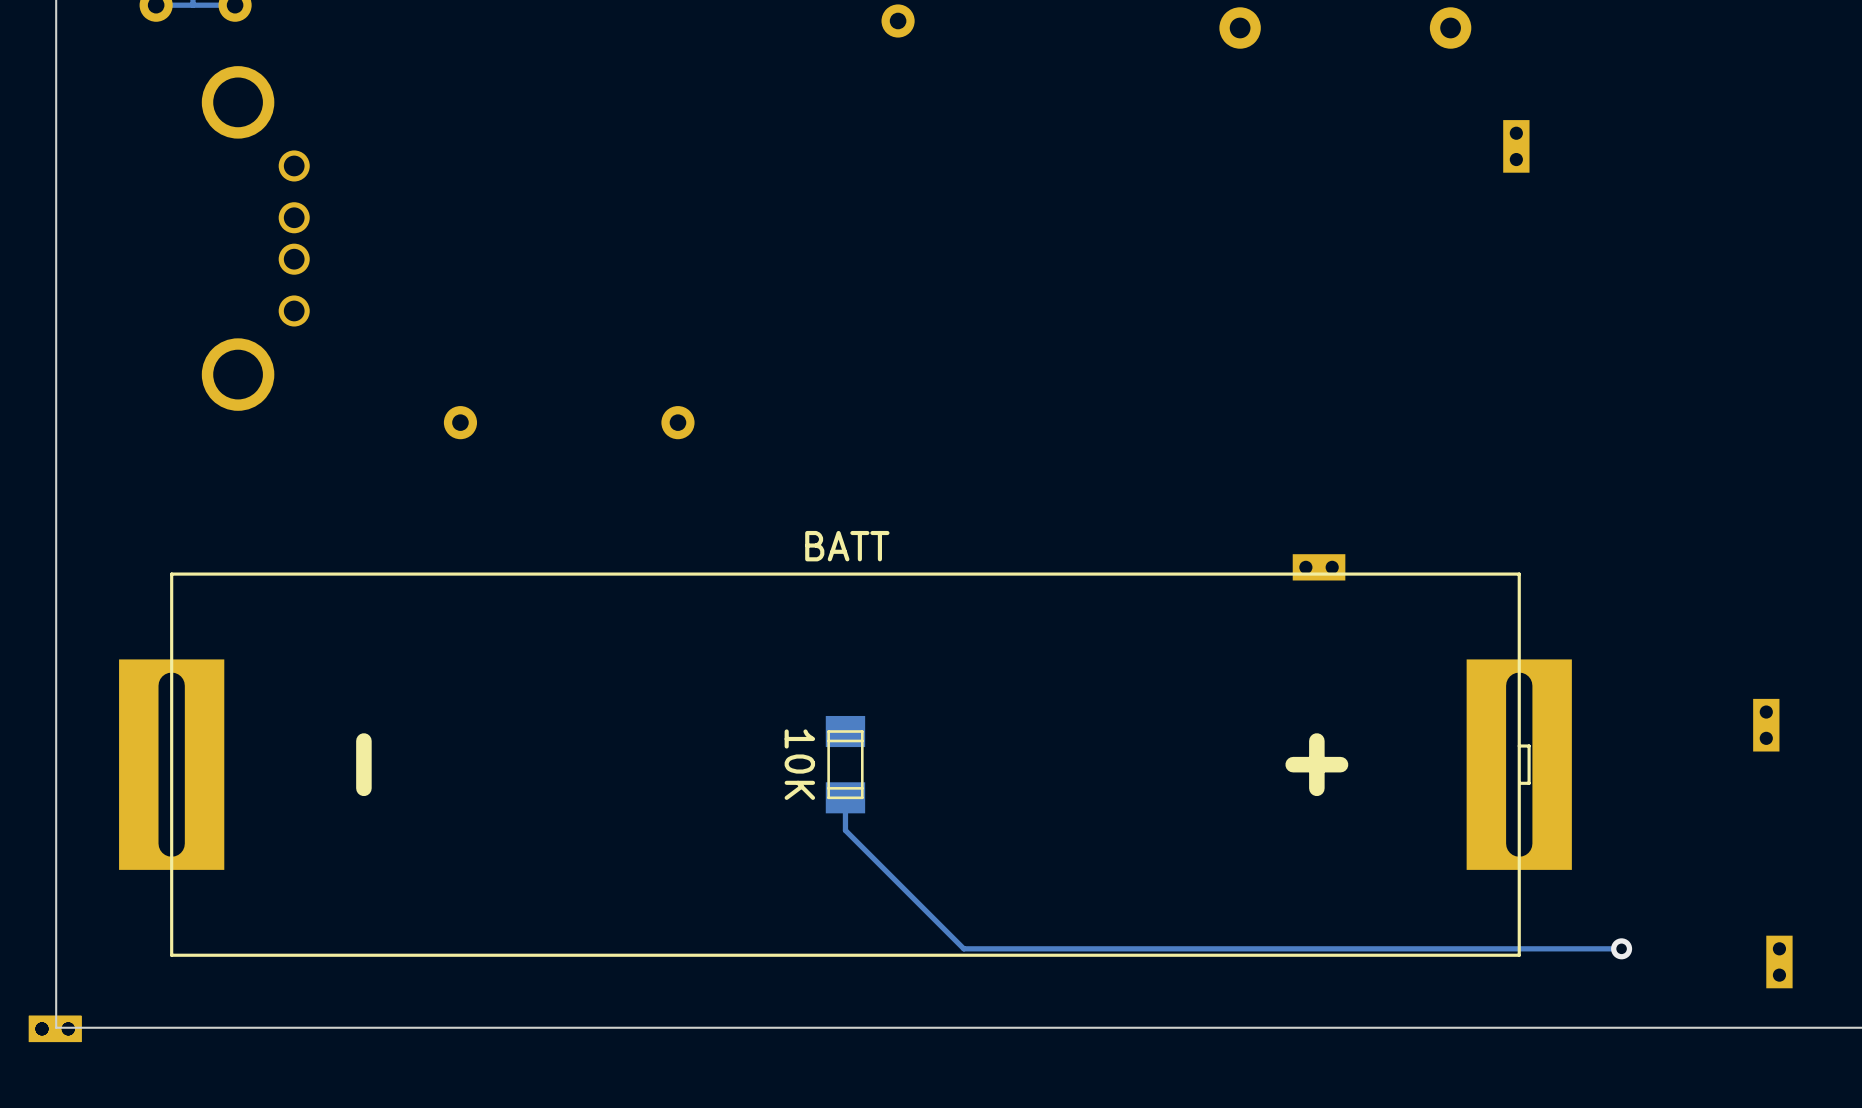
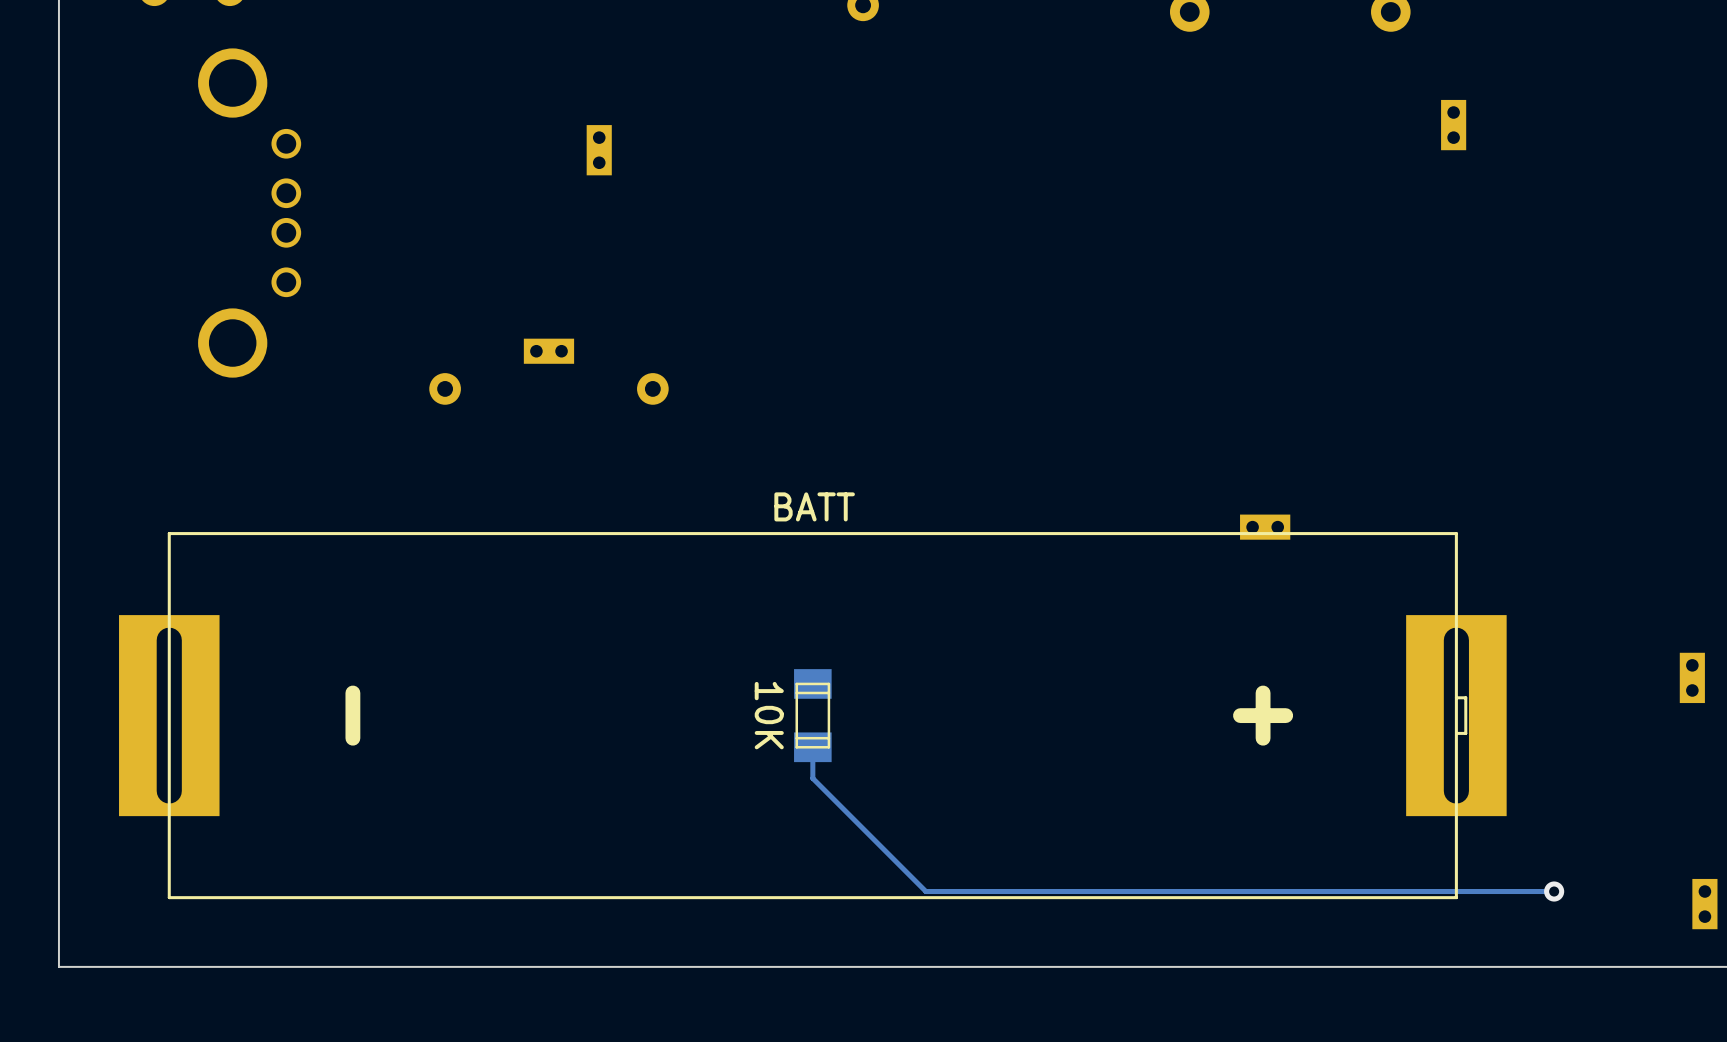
part: none -> (599, 150)
part: none -> (548, 351)
part: (55, 1028) -> none

